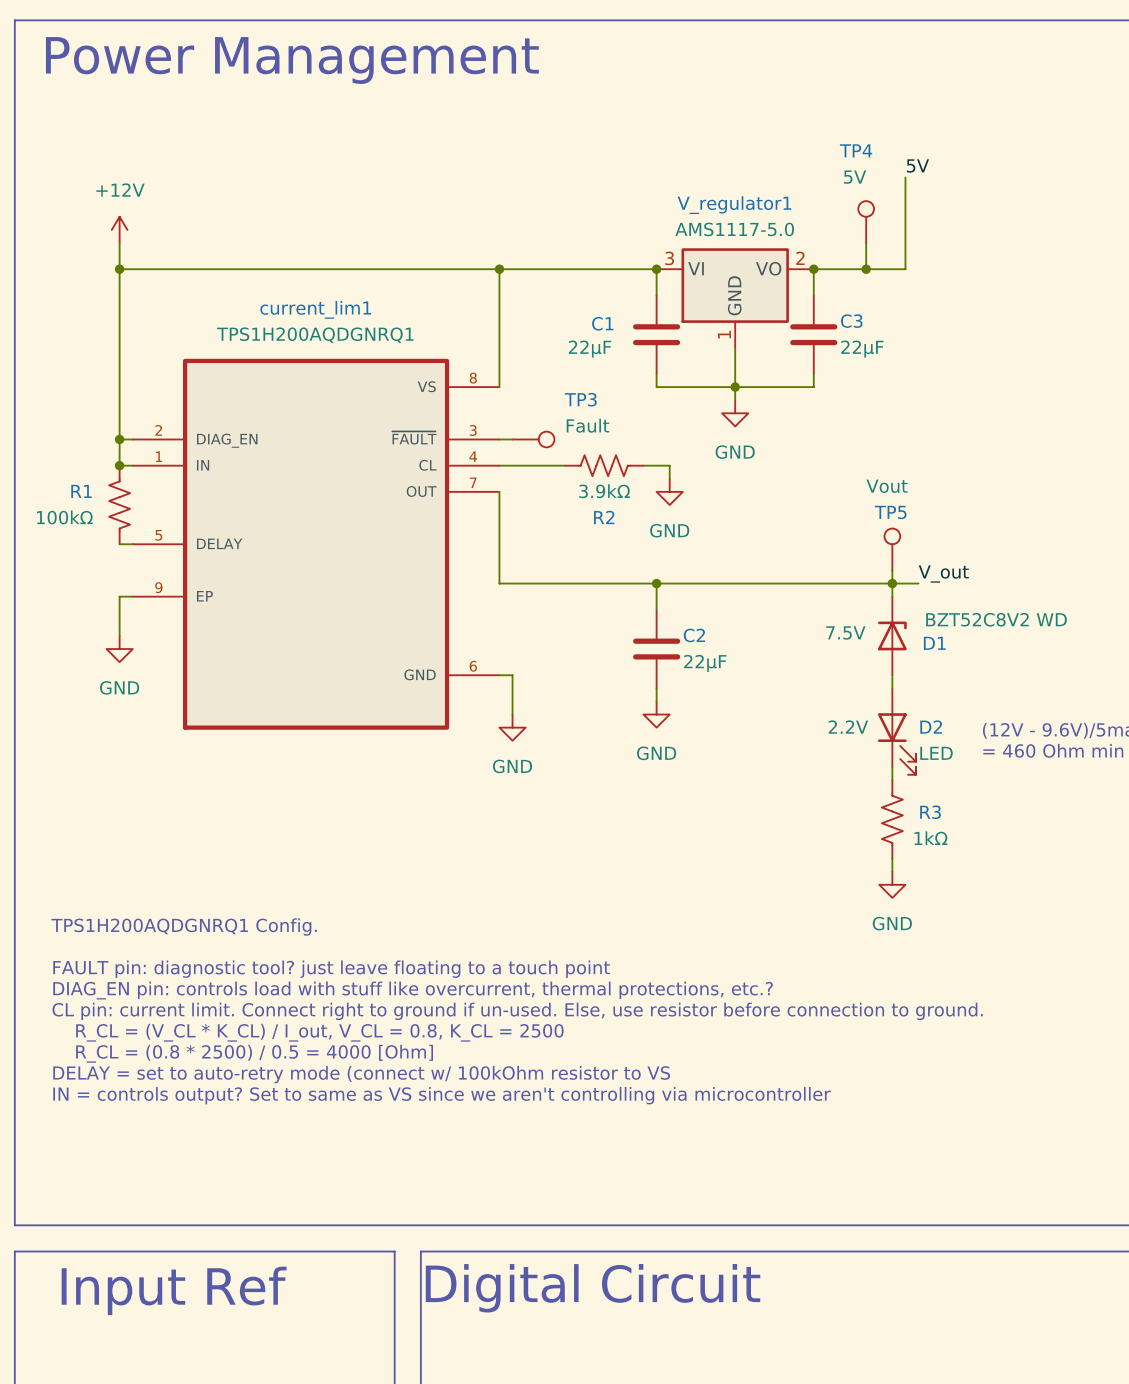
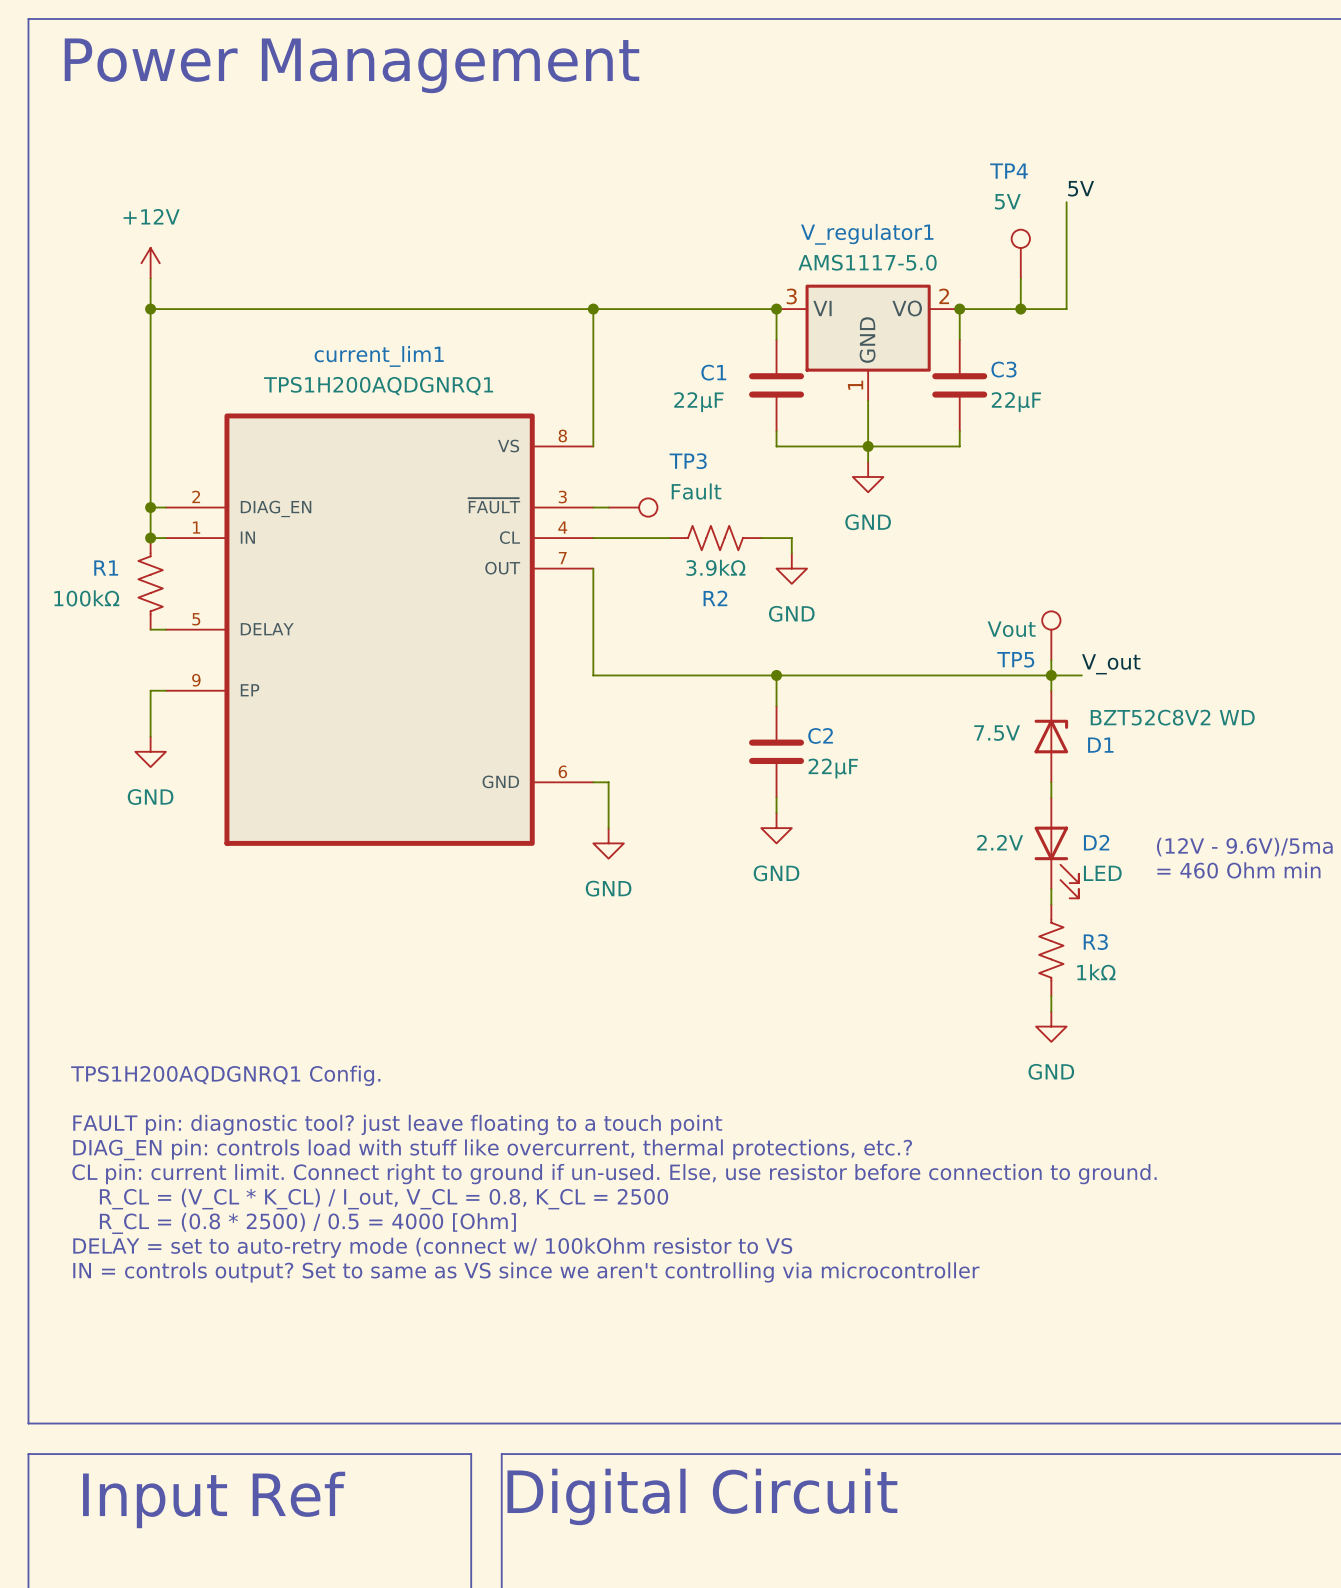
TP5 value position: Vout (887, 486) -> Vout (1011, 629)
TP5 name position: TP5 (890, 512) -> TP5 (1015, 659)

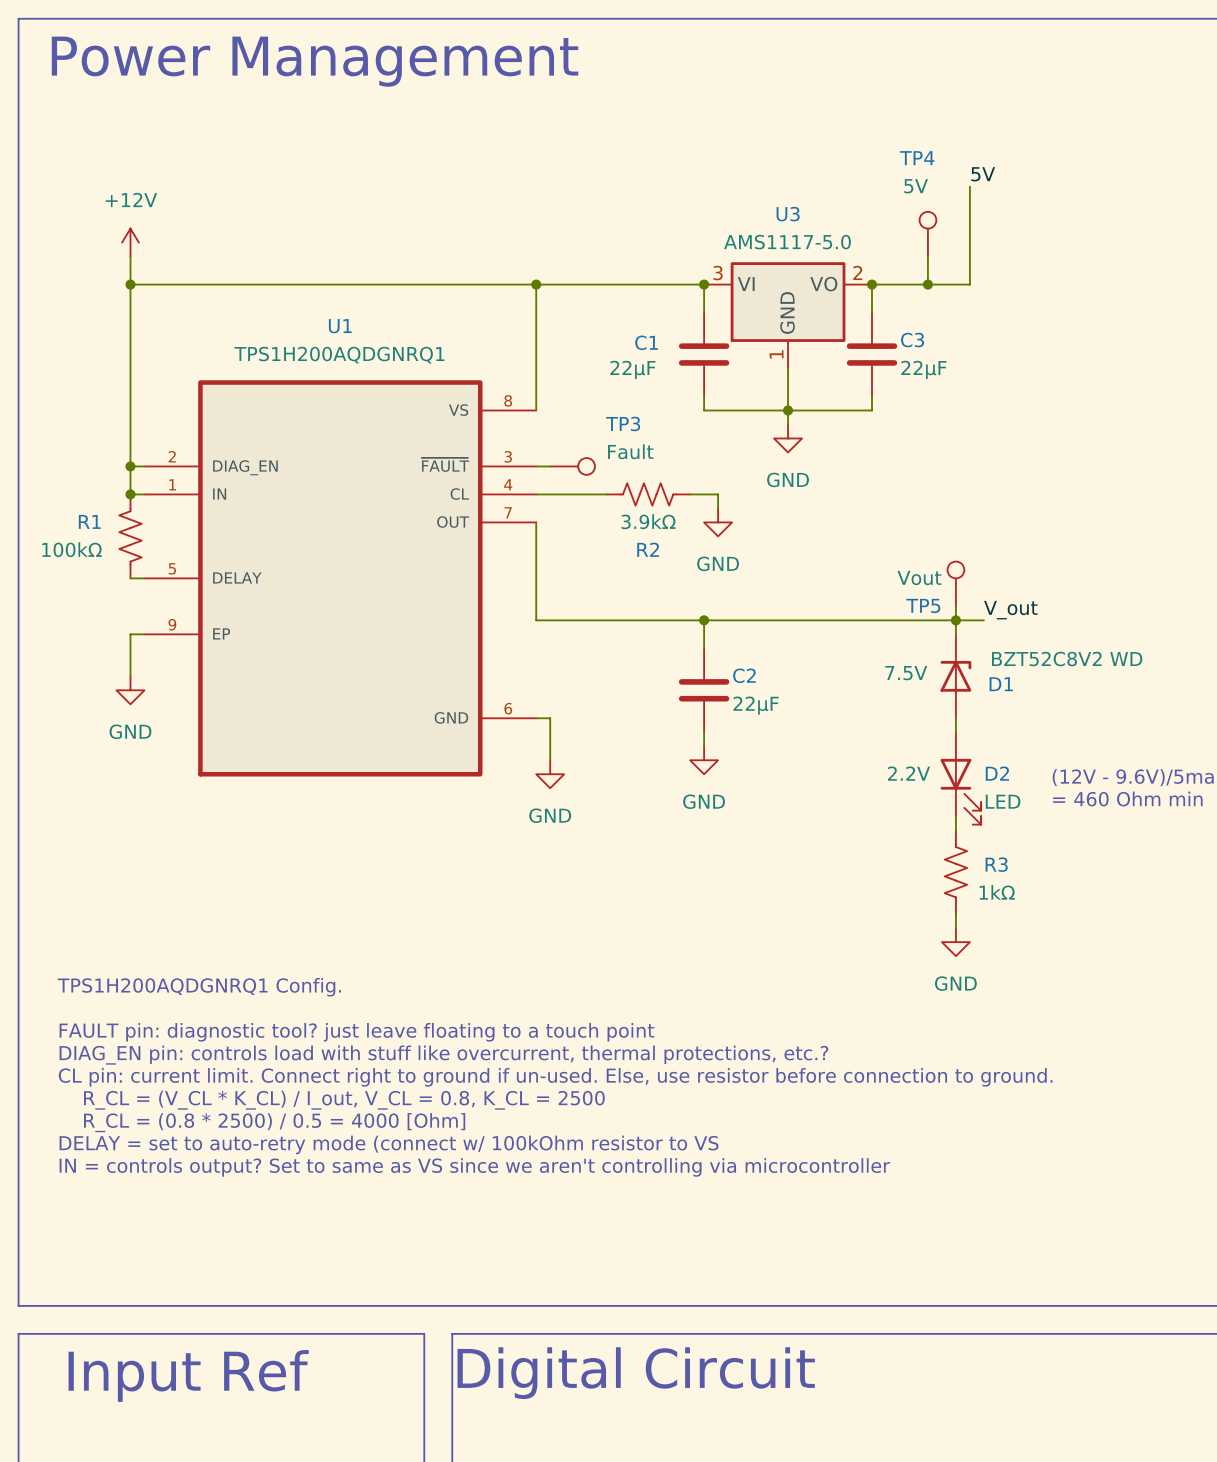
V_regulator1 name: V_regulator1 (867, 234) -> U3 (788, 214)
current_lim1 name: current_lim1 (379, 356) -> U1 (340, 326)

